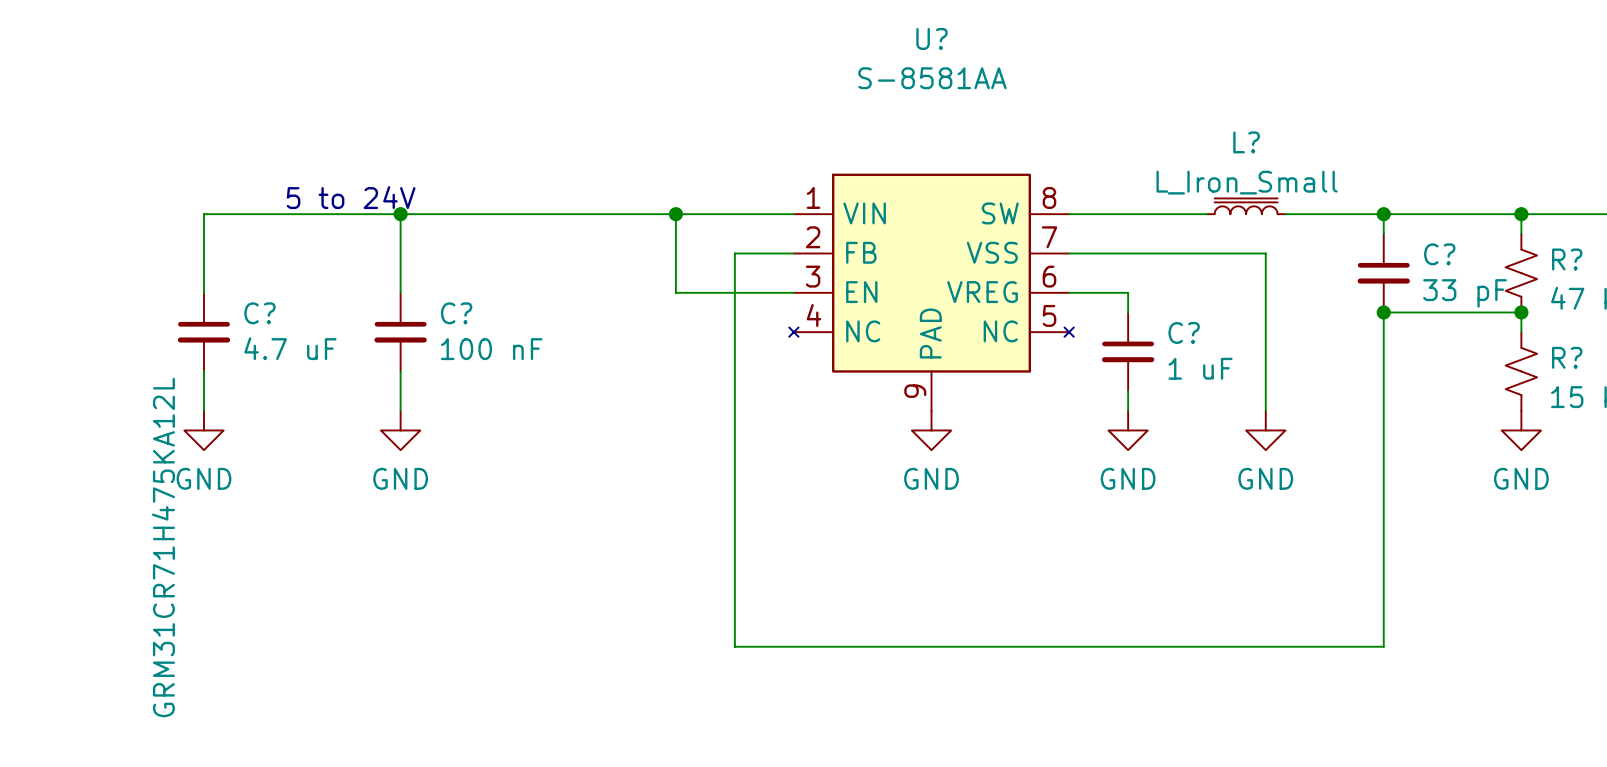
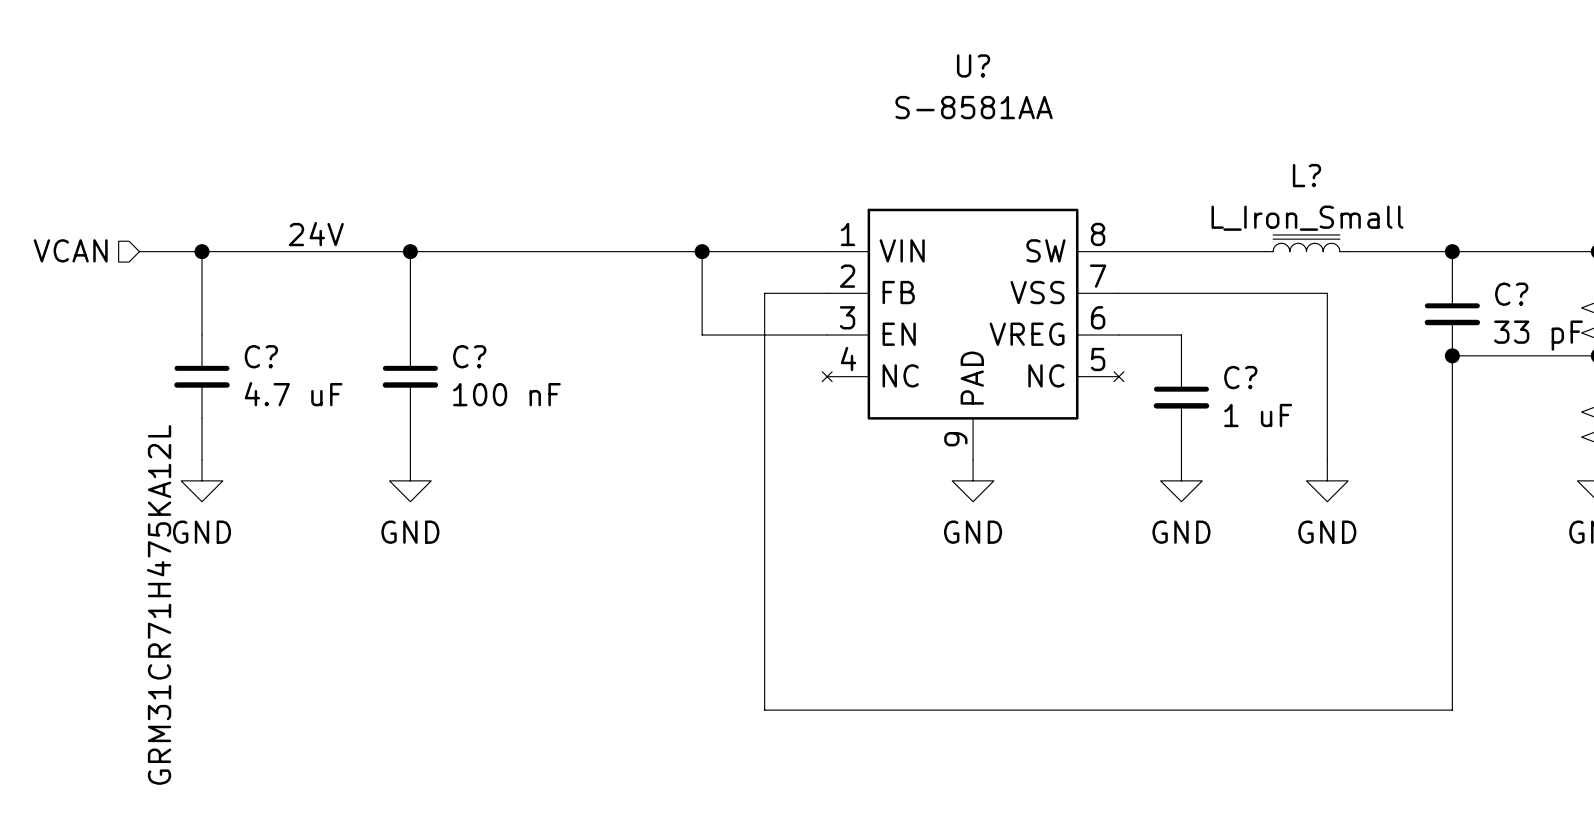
text: 5 to 24V (351, 197) -> 24V (316, 234)
hierarchical label: none -> VCAN (70, 250)
wire: none -> (139, 251) (202, 251)
junction: none -> (202, 251)

